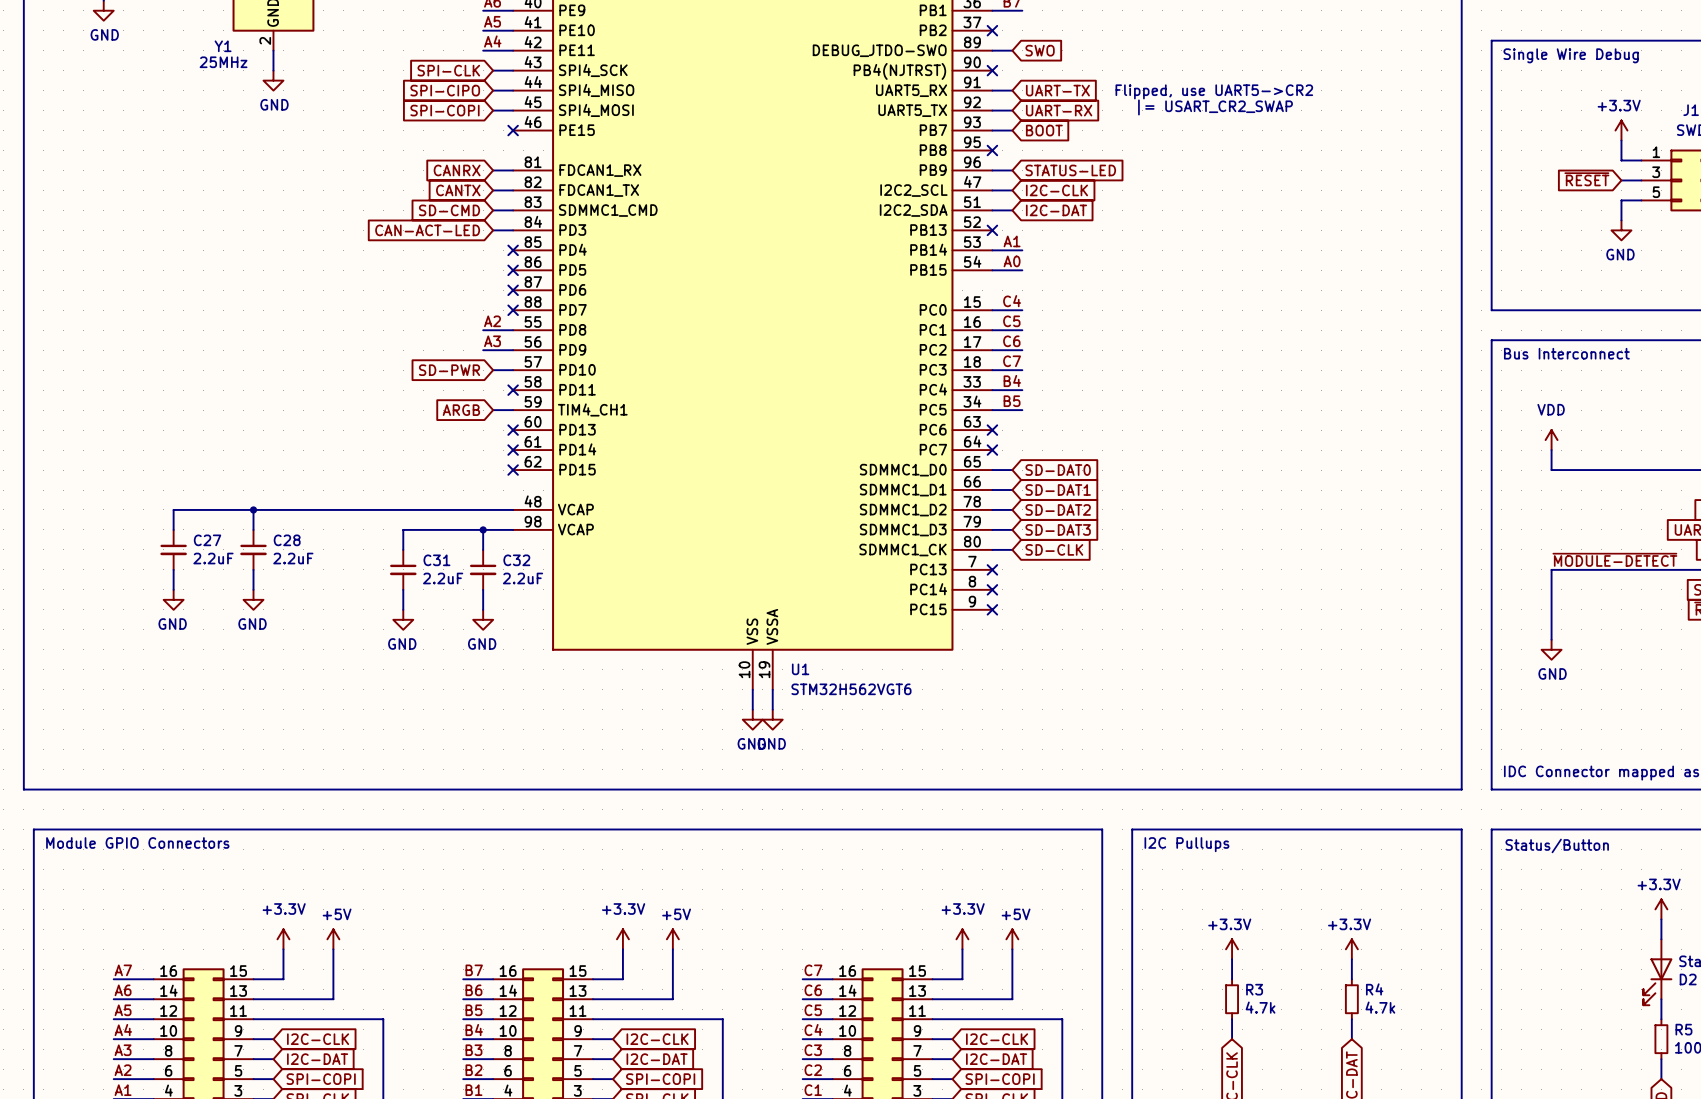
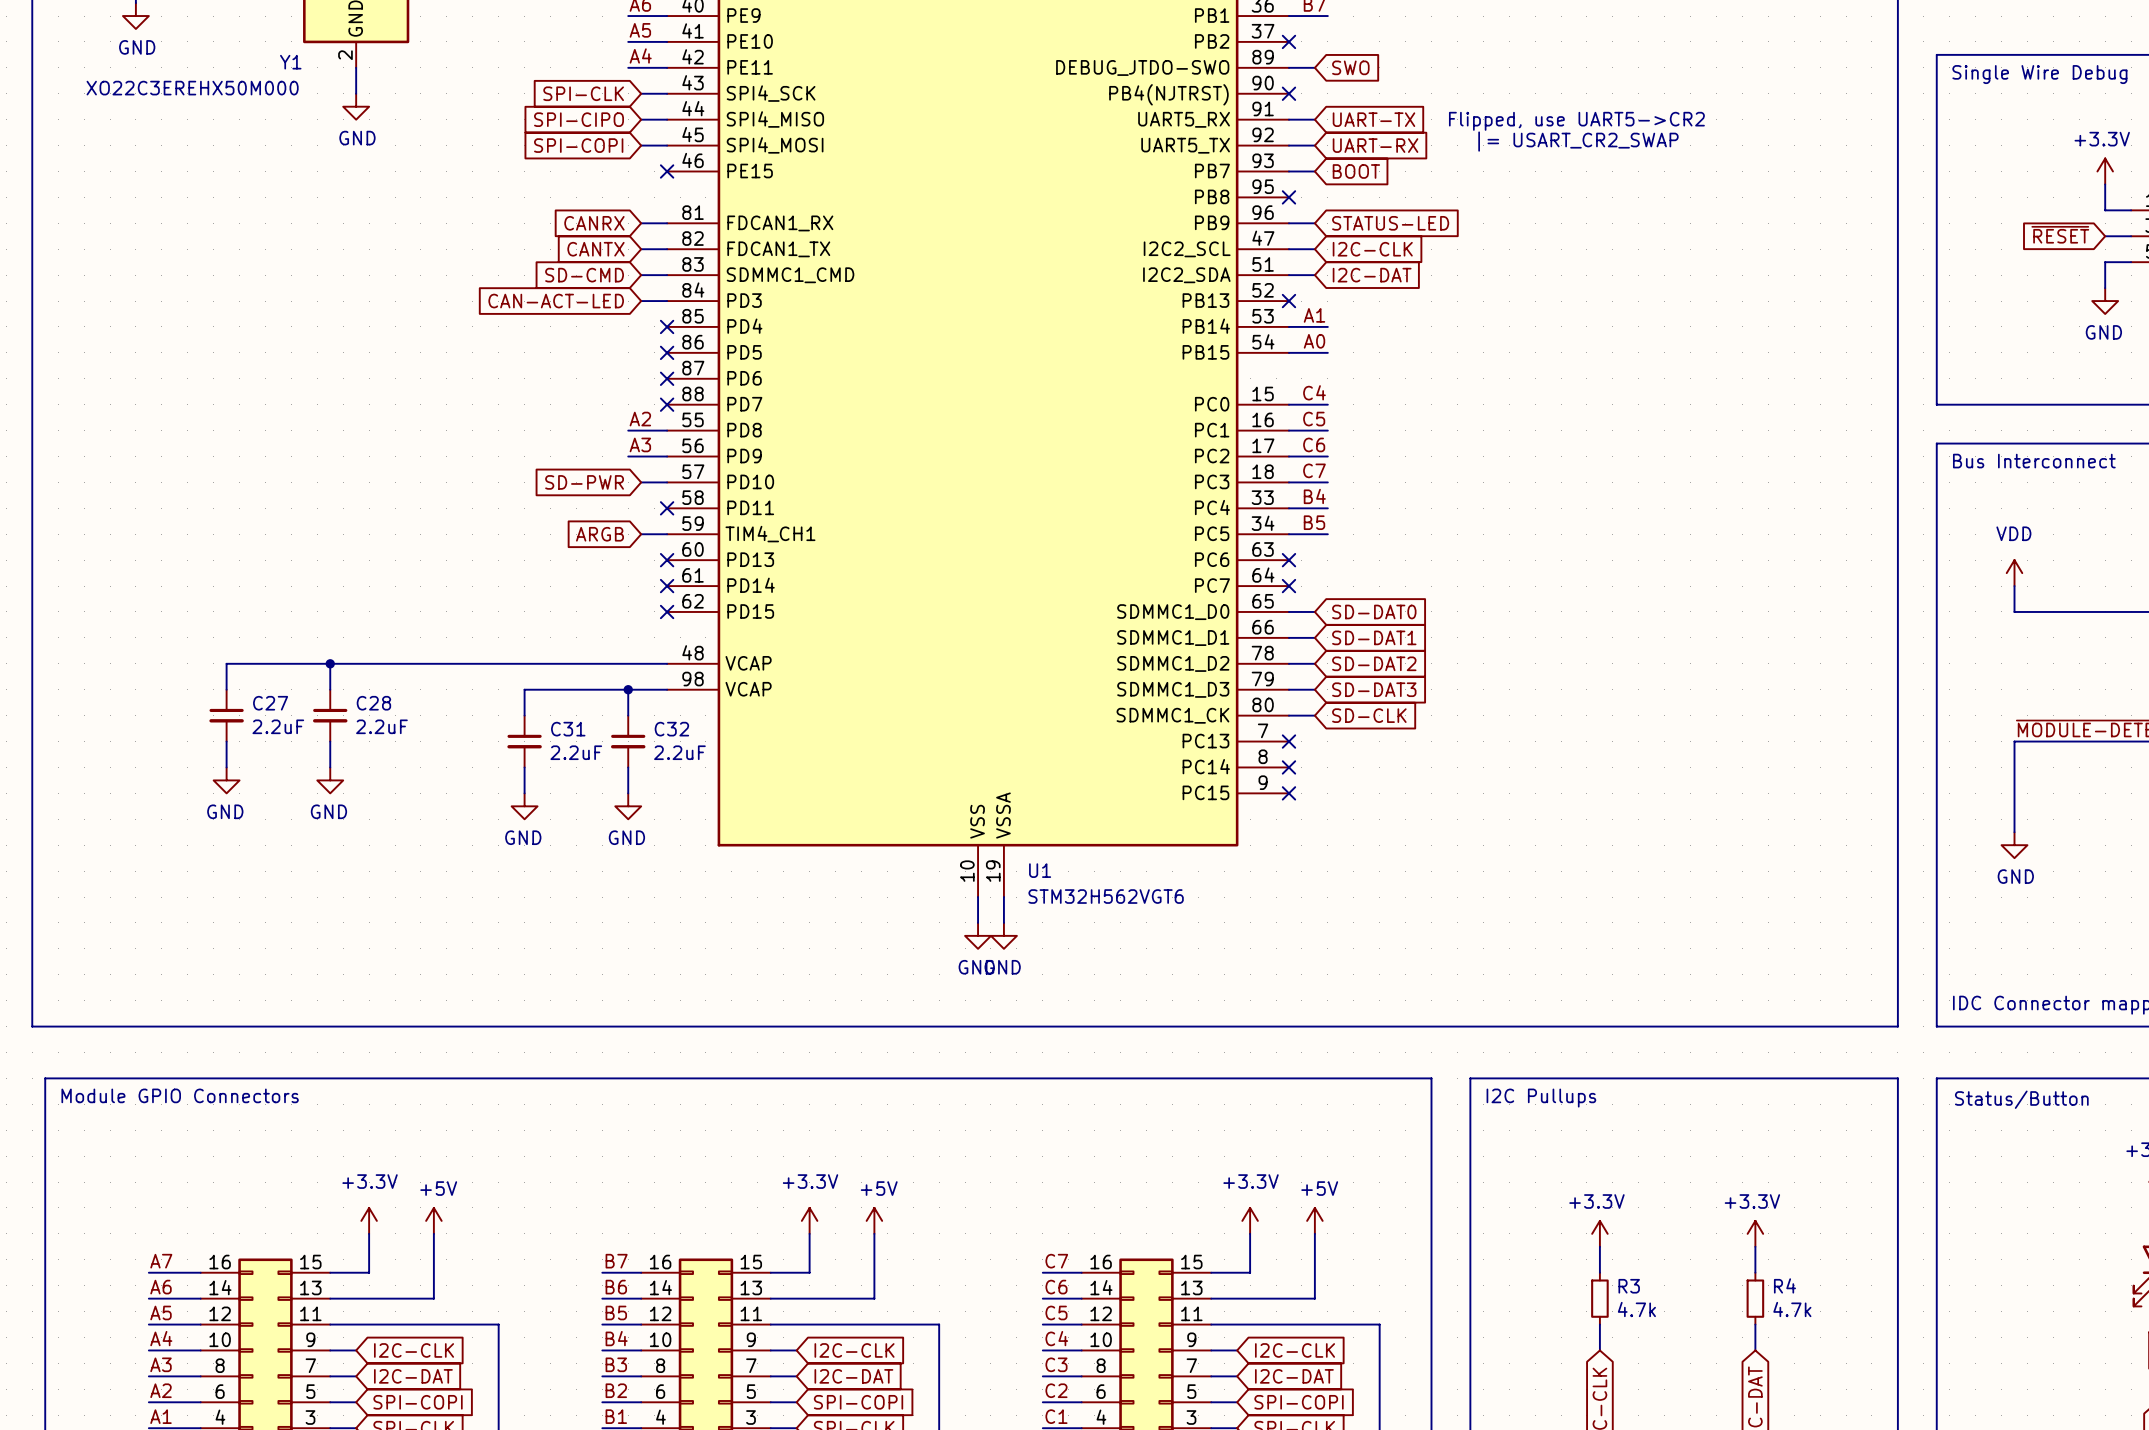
Y1 value: 25MHz (223, 62) -> XO22C3EREHX50M000 (192, 88)

